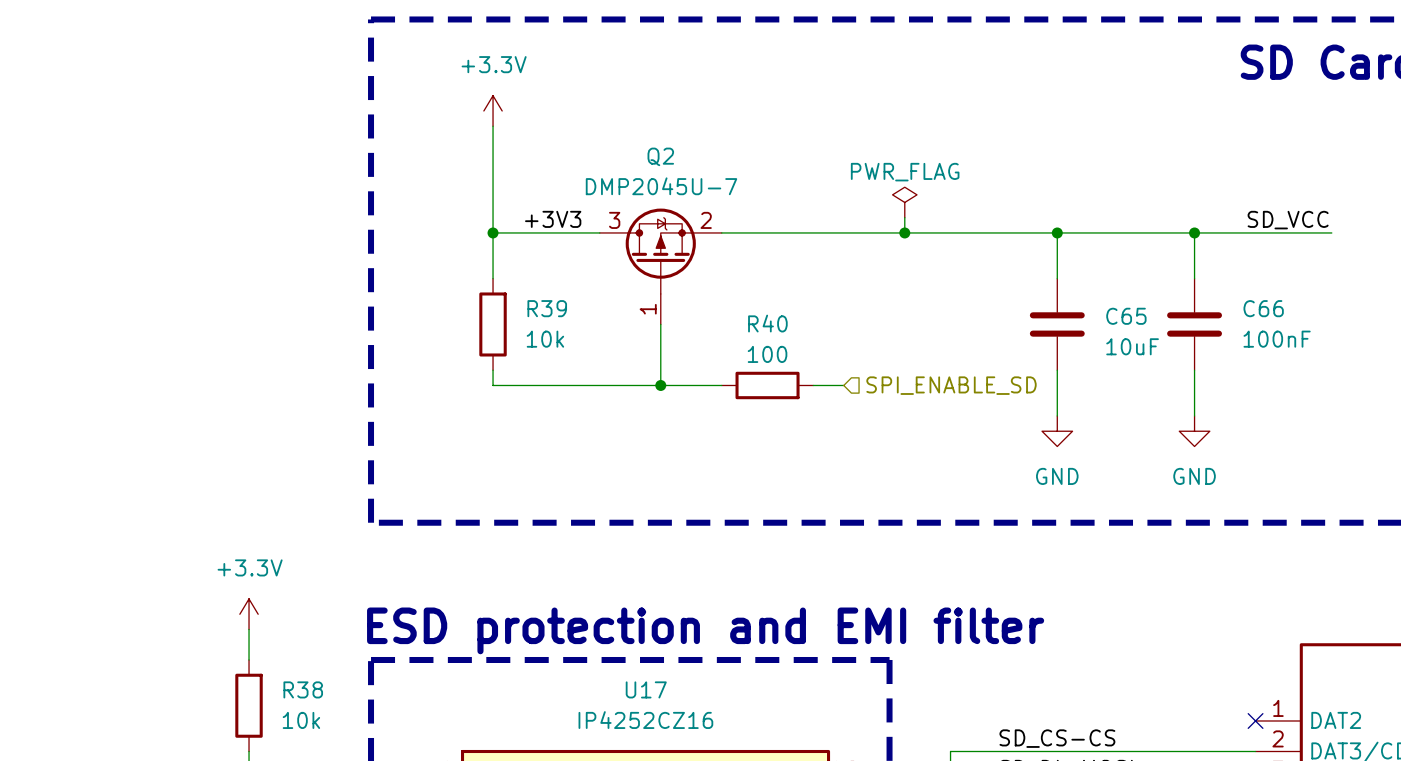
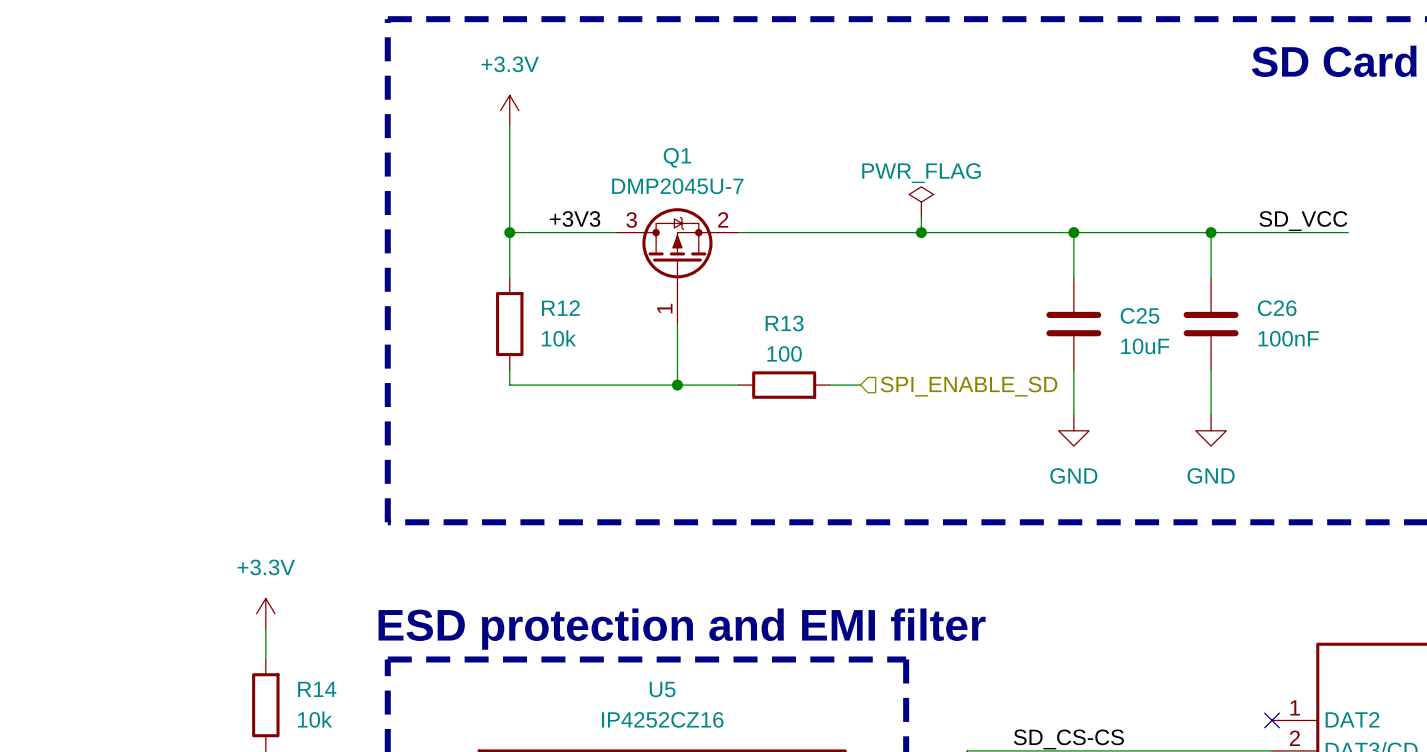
Q2 name: Q2 (660, 156) -> Q1 (677, 157)
R39 name: R39 (547, 308) -> R12 (560, 308)
C66 name: C66 (1263, 308) -> C26 (1277, 308)
C65 name: C65 (1126, 316) -> C25 (1140, 315)
R40 name: R40 (767, 323) -> R13 (784, 323)
R38 name: R38 (303, 689) -> R14 (317, 689)
U17 name: U17 (646, 689) -> U5 (662, 689)

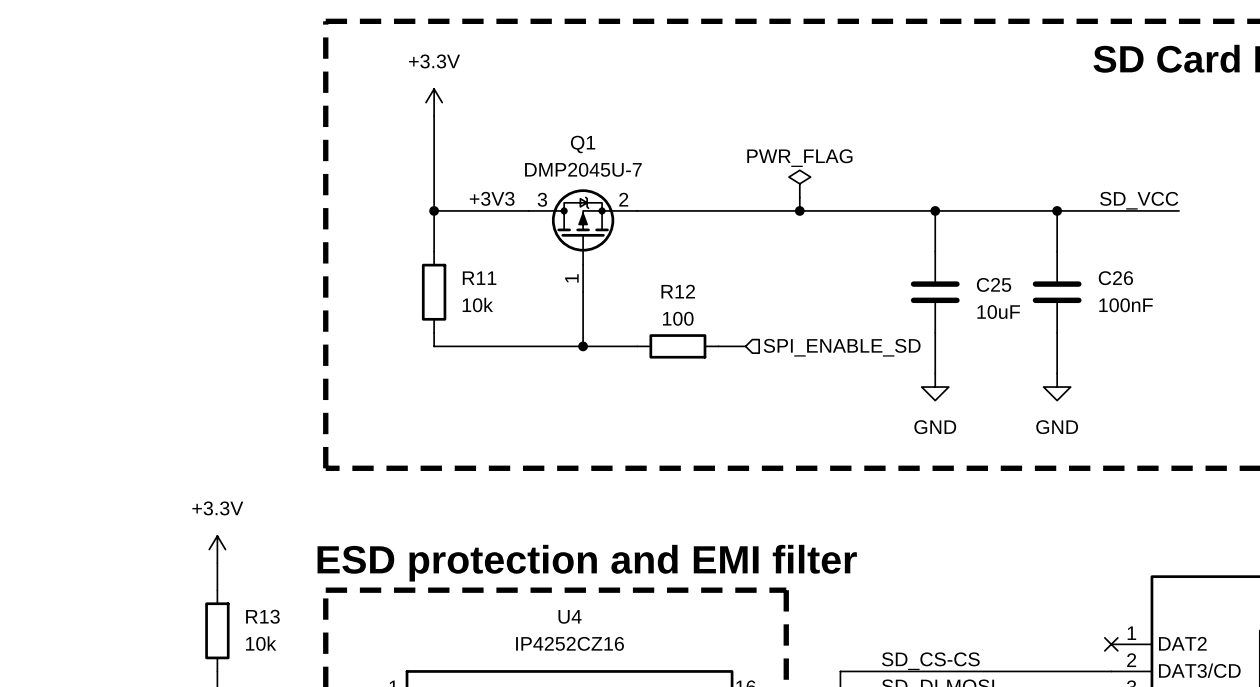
R12 name: R12 (560, 308) -> R11 (479, 278)
R13 name: R13 (784, 323) -> R12 (678, 291)
R14 name: R14 (317, 689) -> R13 (262, 616)
U5 name: U5 (662, 689) -> U4 (570, 616)

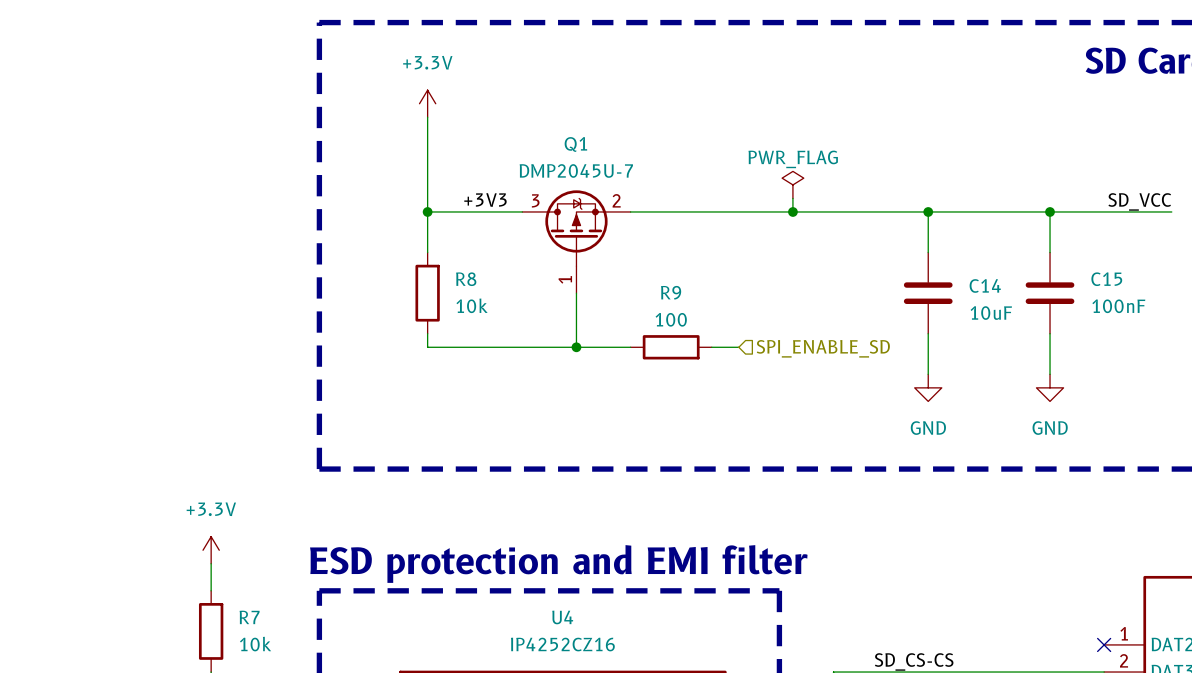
R11 name: R11 (479, 278) -> R8 (466, 279)
C26 name: C26 (1115, 278) -> C15 (1106, 279)
C25 name: C25 (994, 284) -> C14 (985, 285)
R12 name: R12 (678, 291) -> R9 (671, 292)
R13 name: R13 (262, 616) -> R7 (249, 617)

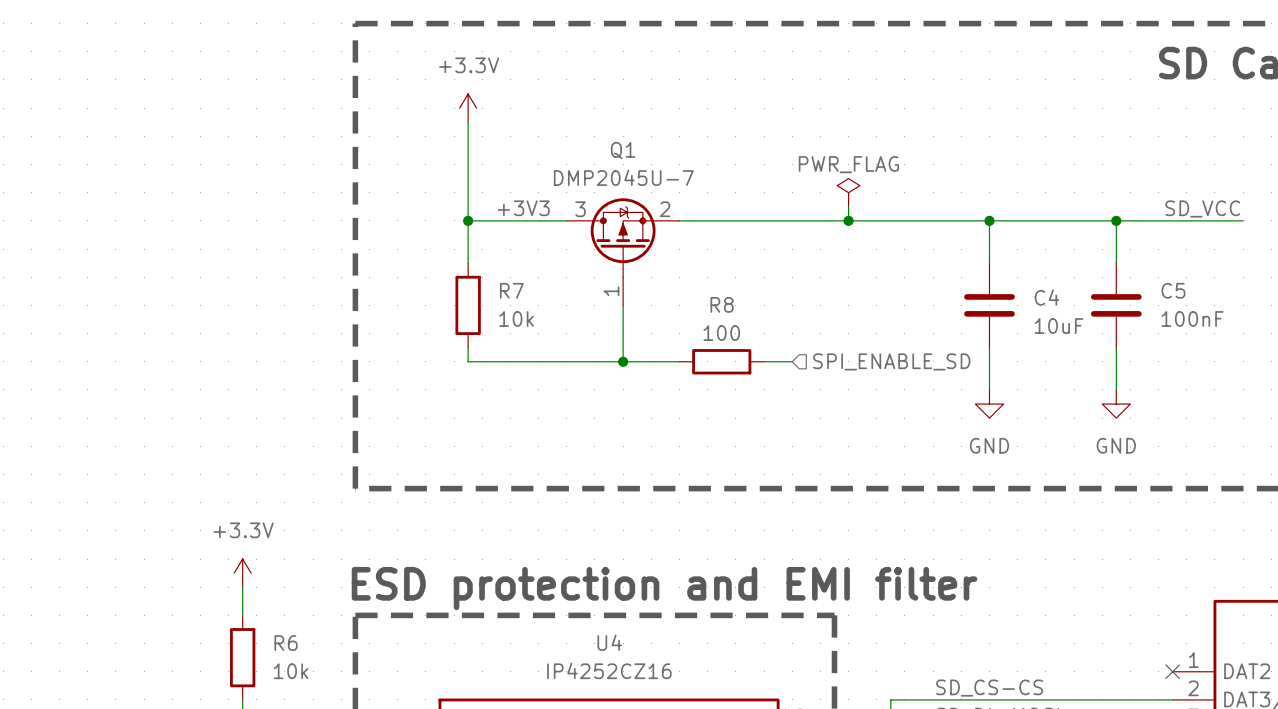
R8 name: R8 (466, 279) -> R7 (511, 290)
C15 name: C15 (1106, 279) -> C5 (1173, 290)
C14 name: C14 (985, 285) -> C4 (1046, 297)
R9 name: R9 (671, 292) -> R8 (722, 304)
R7 name: R7 (249, 617) -> R6 (286, 643)

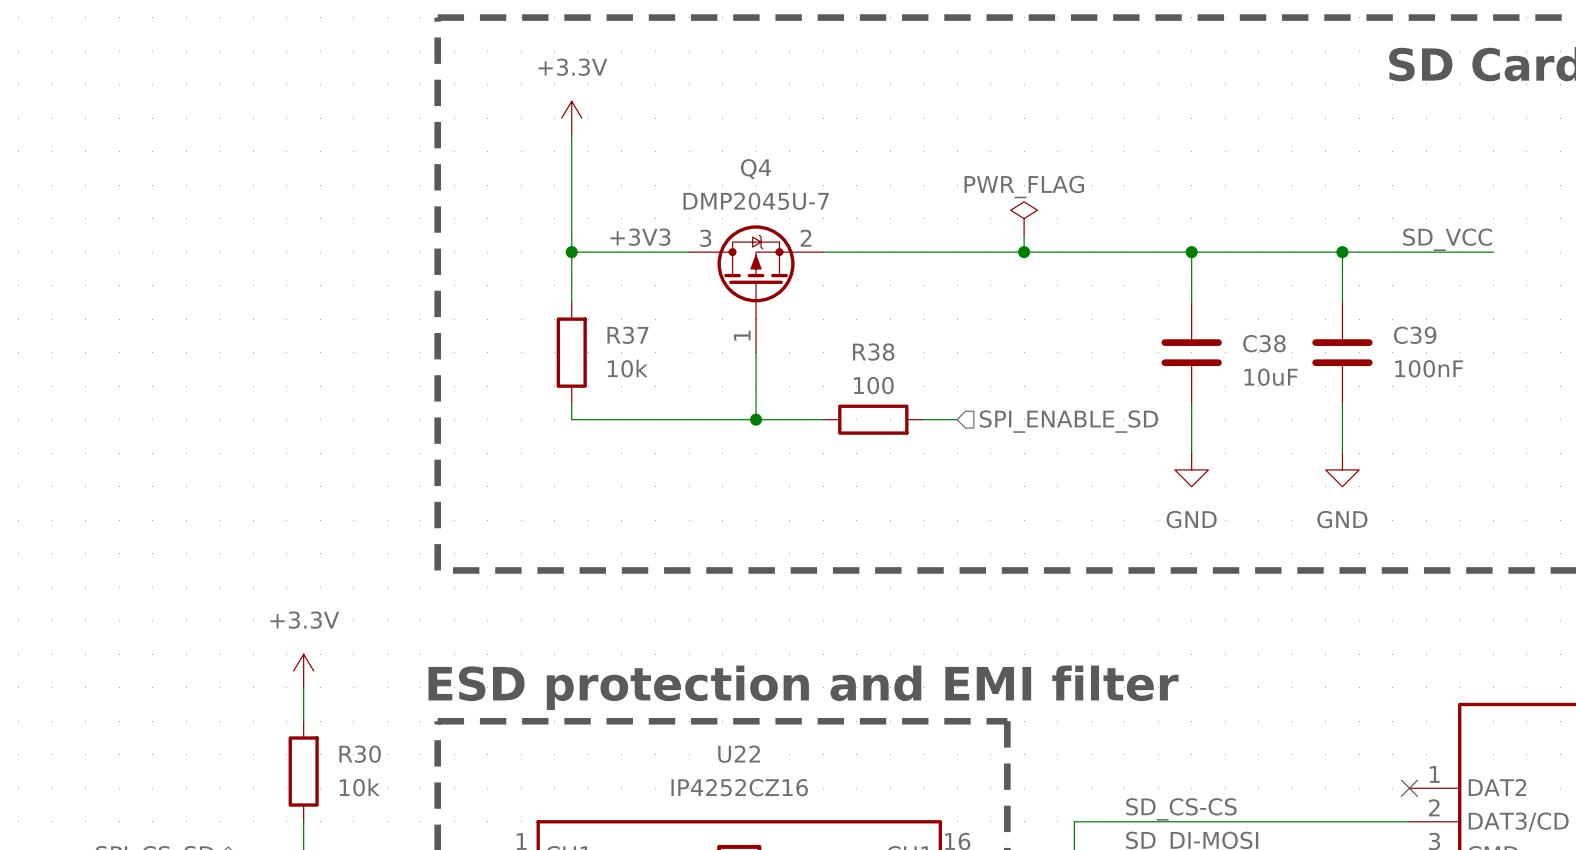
Q1 name: Q1 (623, 150) -> Q4 (756, 169)
R7 name: R7 (511, 290) -> R37 (627, 335)
C5 name: C5 (1173, 290) -> C39 (1415, 335)
C4 name: C4 (1046, 297) -> C38 (1264, 343)
R8 name: R8 (722, 304) -> R38 (873, 352)
U4 name: U4 (609, 642) -> U22 (739, 754)
R6 name: R6 (286, 643) -> R30 (360, 754)

